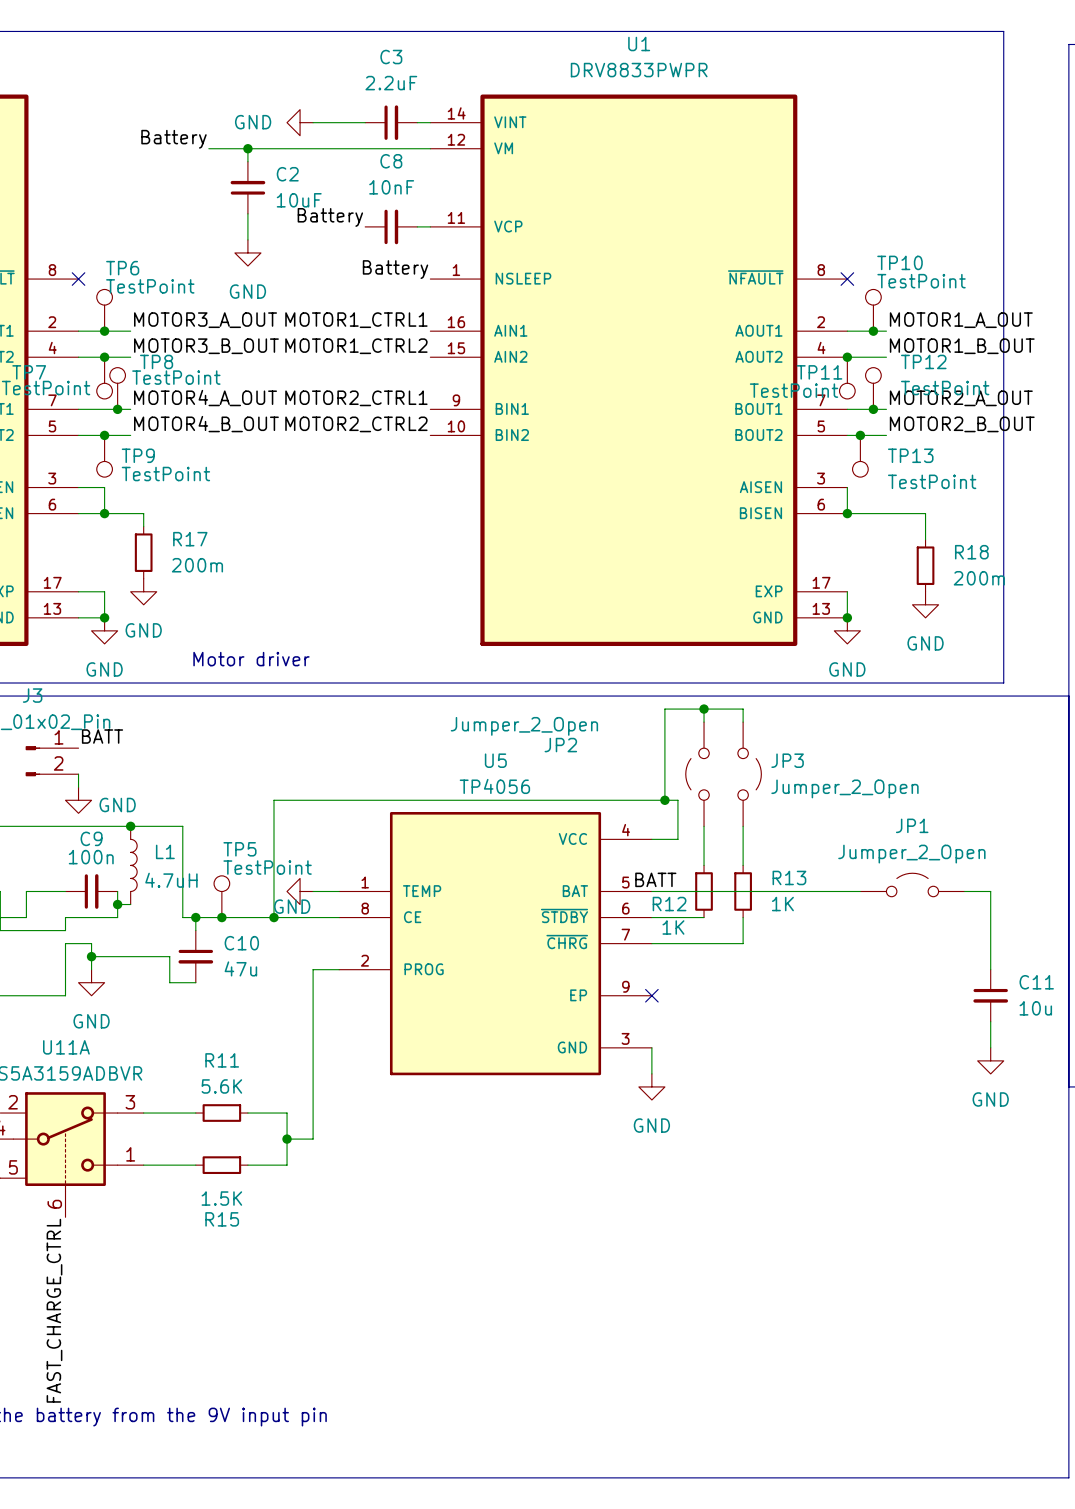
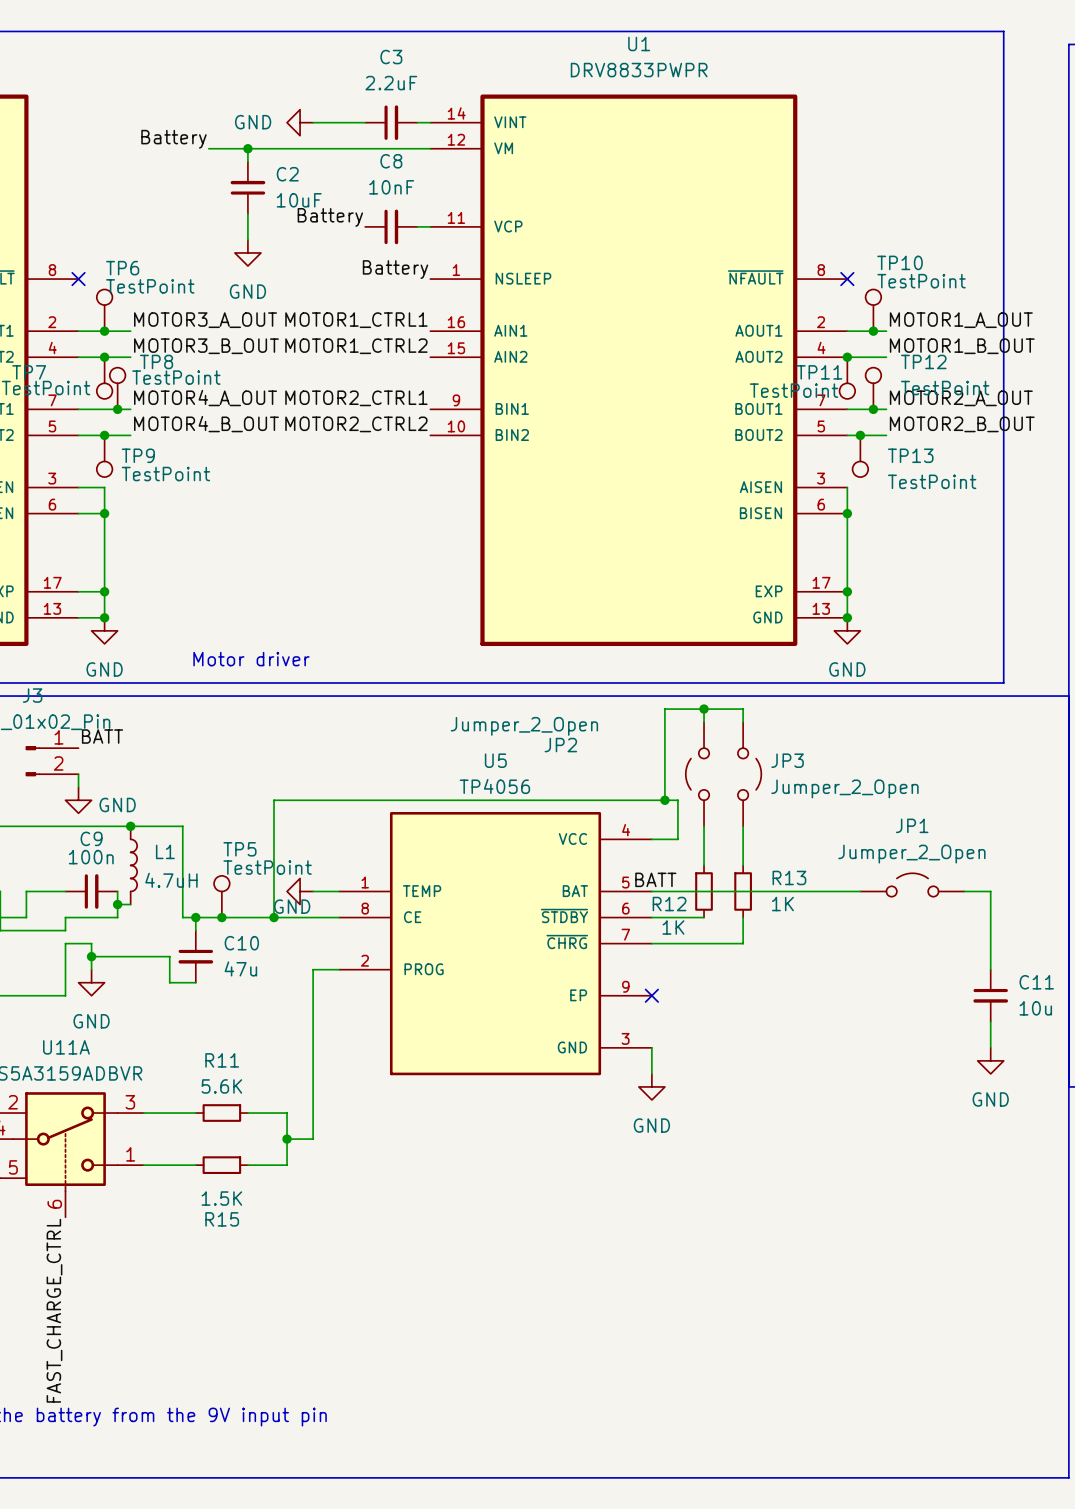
wire: (104, 513) (143, 513) (143, 526) -> (104, 513) (104, 591)
wire: (847, 513) (925, 513) (925, 539) -> (847, 513) (847, 591)
R17: 200m (143, 552) -> none
R18: 200m (925, 565) -> none
junction: none -> (104, 591)
power symbol: GND (143, 591) -> none
junction: none -> (847, 591)
power symbol: GND (925, 604) -> none

